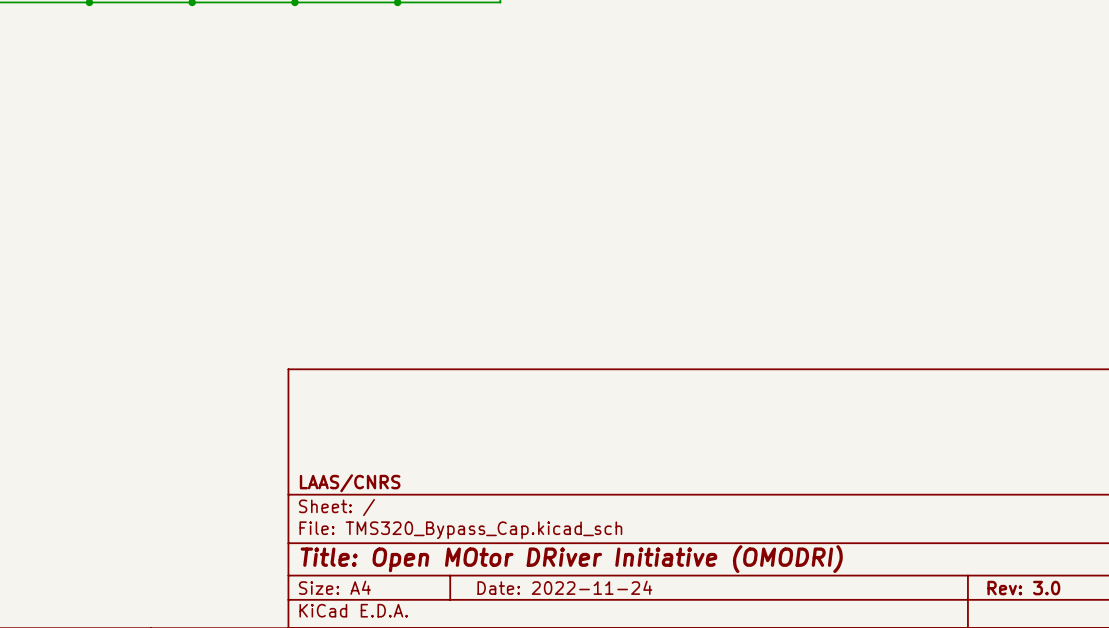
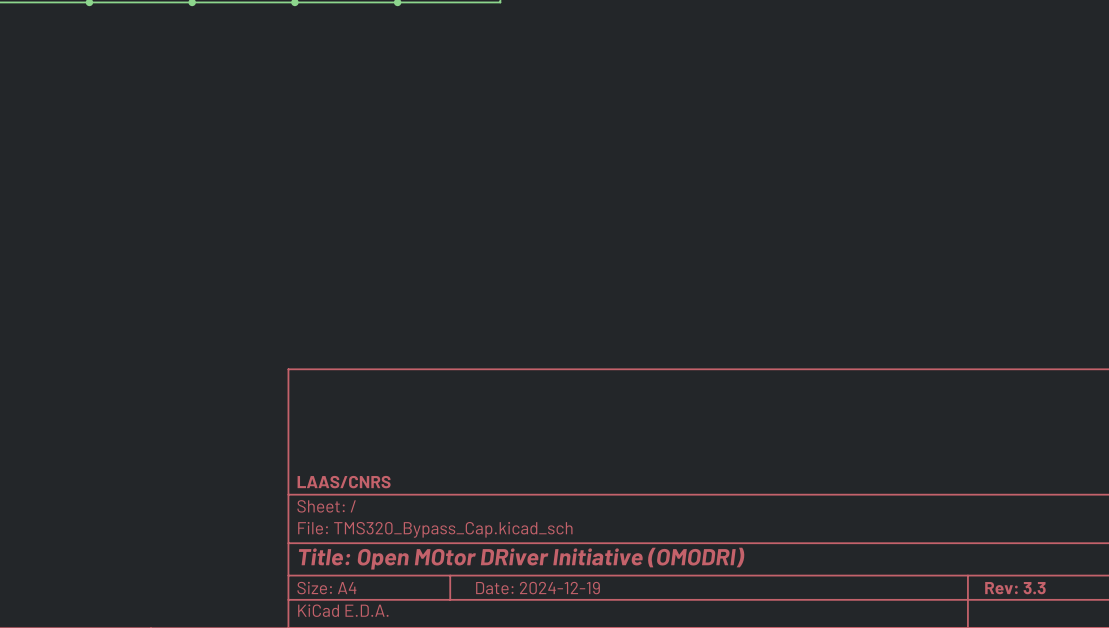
title block: Date: 2022-11-24 (564, 587) -> Date: 2024-12-19 (538, 588)
title block: Rev: 3.0 (1023, 588) -> Rev: 3.3 (1015, 588)

